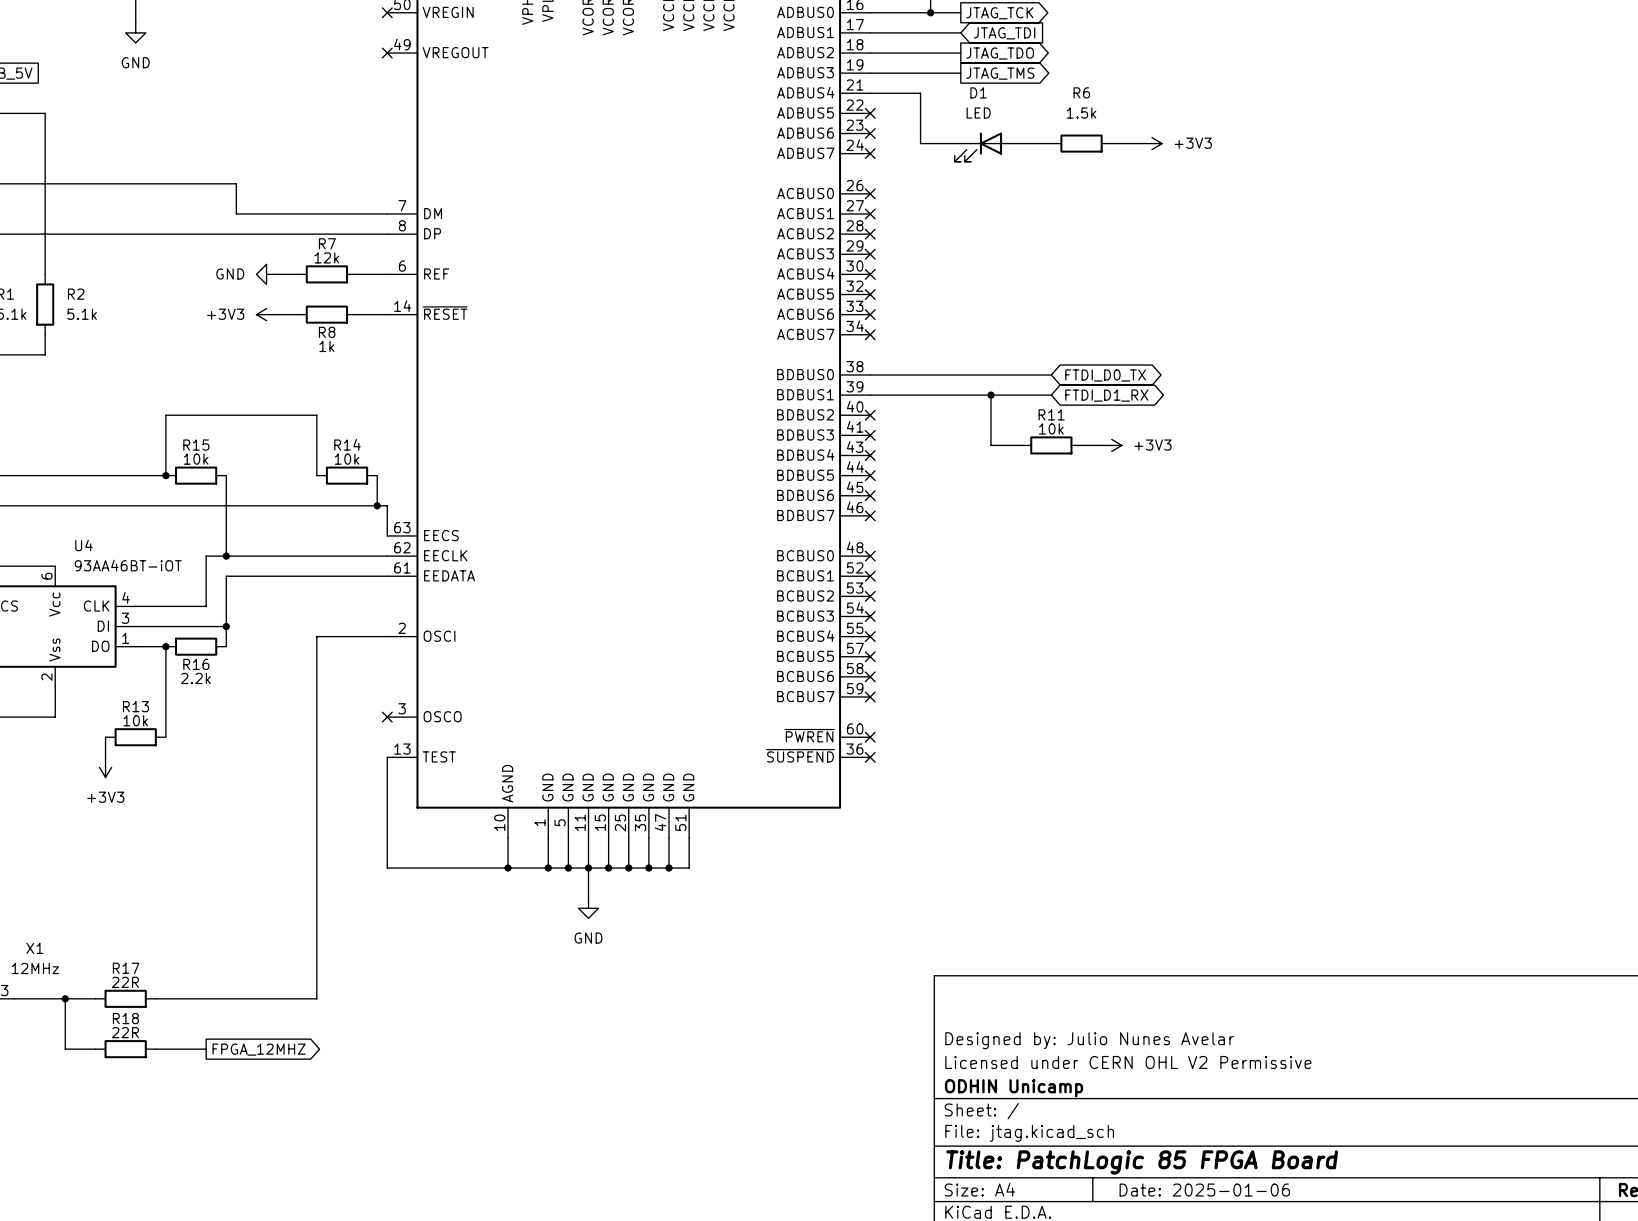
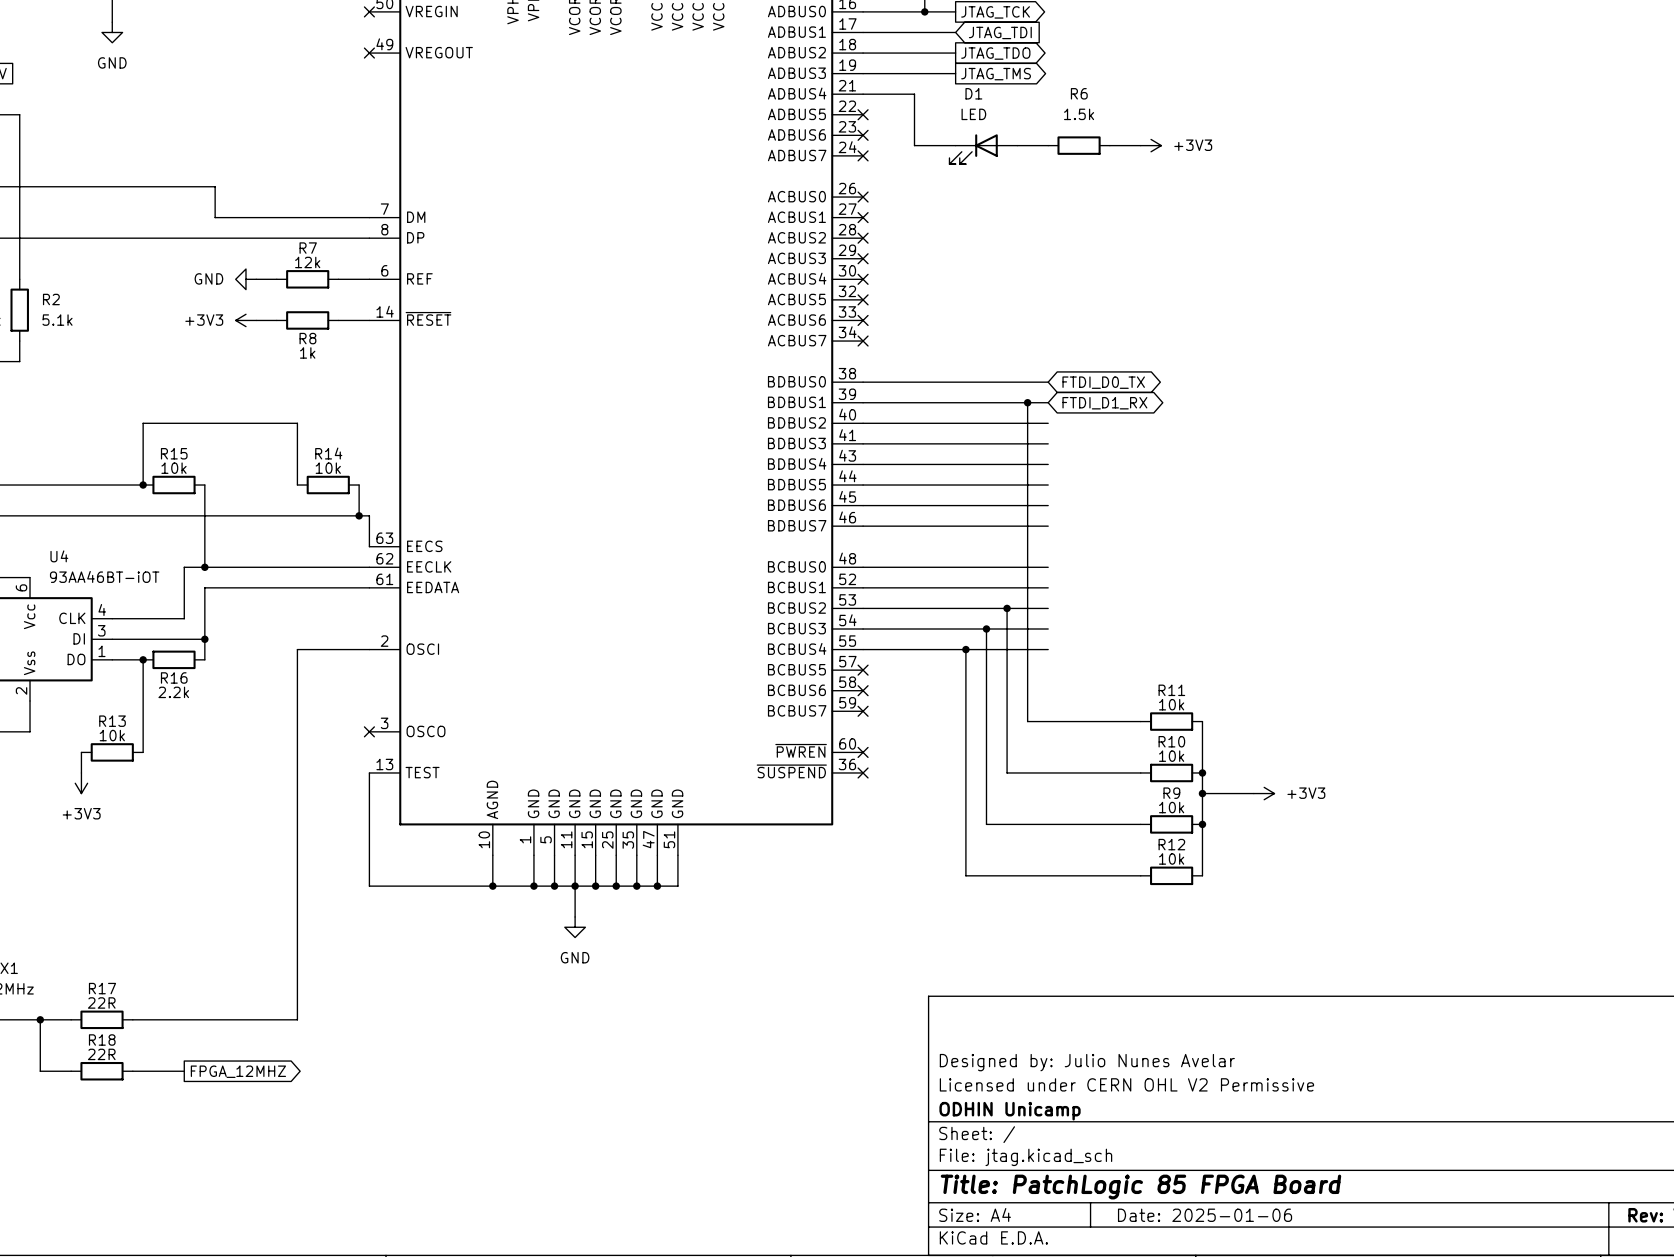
wire: (990, 395) (990, 445) (1021, 445) -> none
junction position: (990, 395) -> (1027, 402)
wire: none -> (1027, 402) (1027, 721) (1140, 721)
wire: none -> (863, 423) (1048, 423)
no-connect mark: (870, 415) -> none
wire: none -> (863, 443) (1048, 443)
no-connect mark: (870, 435) -> none
R11 position: (1051, 445) -> (1171, 721)
wire: (1081, 445) (1101, 445) -> none
power symbol: +3V3 (1111, 445) -> none
wire: none -> (863, 464) (1048, 464)
no-connect mark: (870, 455) -> none
wire: none -> (863, 485) (1048, 485)
no-connect mark: (870, 475) -> none
wire: none -> (863, 505) (1048, 505)
no-connect mark: (870, 495) -> none
wire: none -> (863, 526) (1048, 526)
no-connect mark: (870, 515) -> none
wire: none -> (863, 567) (1048, 567)
no-connect mark: (870, 556) -> none
wire: none -> (863, 587) (1048, 587)
no-connect mark: (870, 576) -> none
wire: none -> (863, 608) (1048, 608)
no-connect mark: (870, 596) -> none
wire: none -> (1007, 608) (1007, 772) (1140, 772)
junction: none -> (1007, 608)
wire: none -> (863, 628) (1048, 628)
no-connect mark: (870, 616) -> none
wire: none -> (986, 628) (986, 824) (1140, 824)
junction: none -> (986, 628)
wire: none -> (863, 649) (1048, 649)
no-connect mark: (870, 636) -> none
wire: none -> (965, 649) (965, 875) (1140, 875)
junction: none -> (965, 649)
wire: none -> (1202, 721) (1202, 875)
R10: none -> 10k (1171, 772)
junction: none -> (1202, 772)
wire: none -> (1202, 793) (1253, 793)
junction: none -> (1202, 793)
power symbol: none -> +3V3 (1264, 793)
R9: none -> 10k (1171, 824)
junction: none -> (1202, 824)
R12: none -> 10k (1171, 875)

